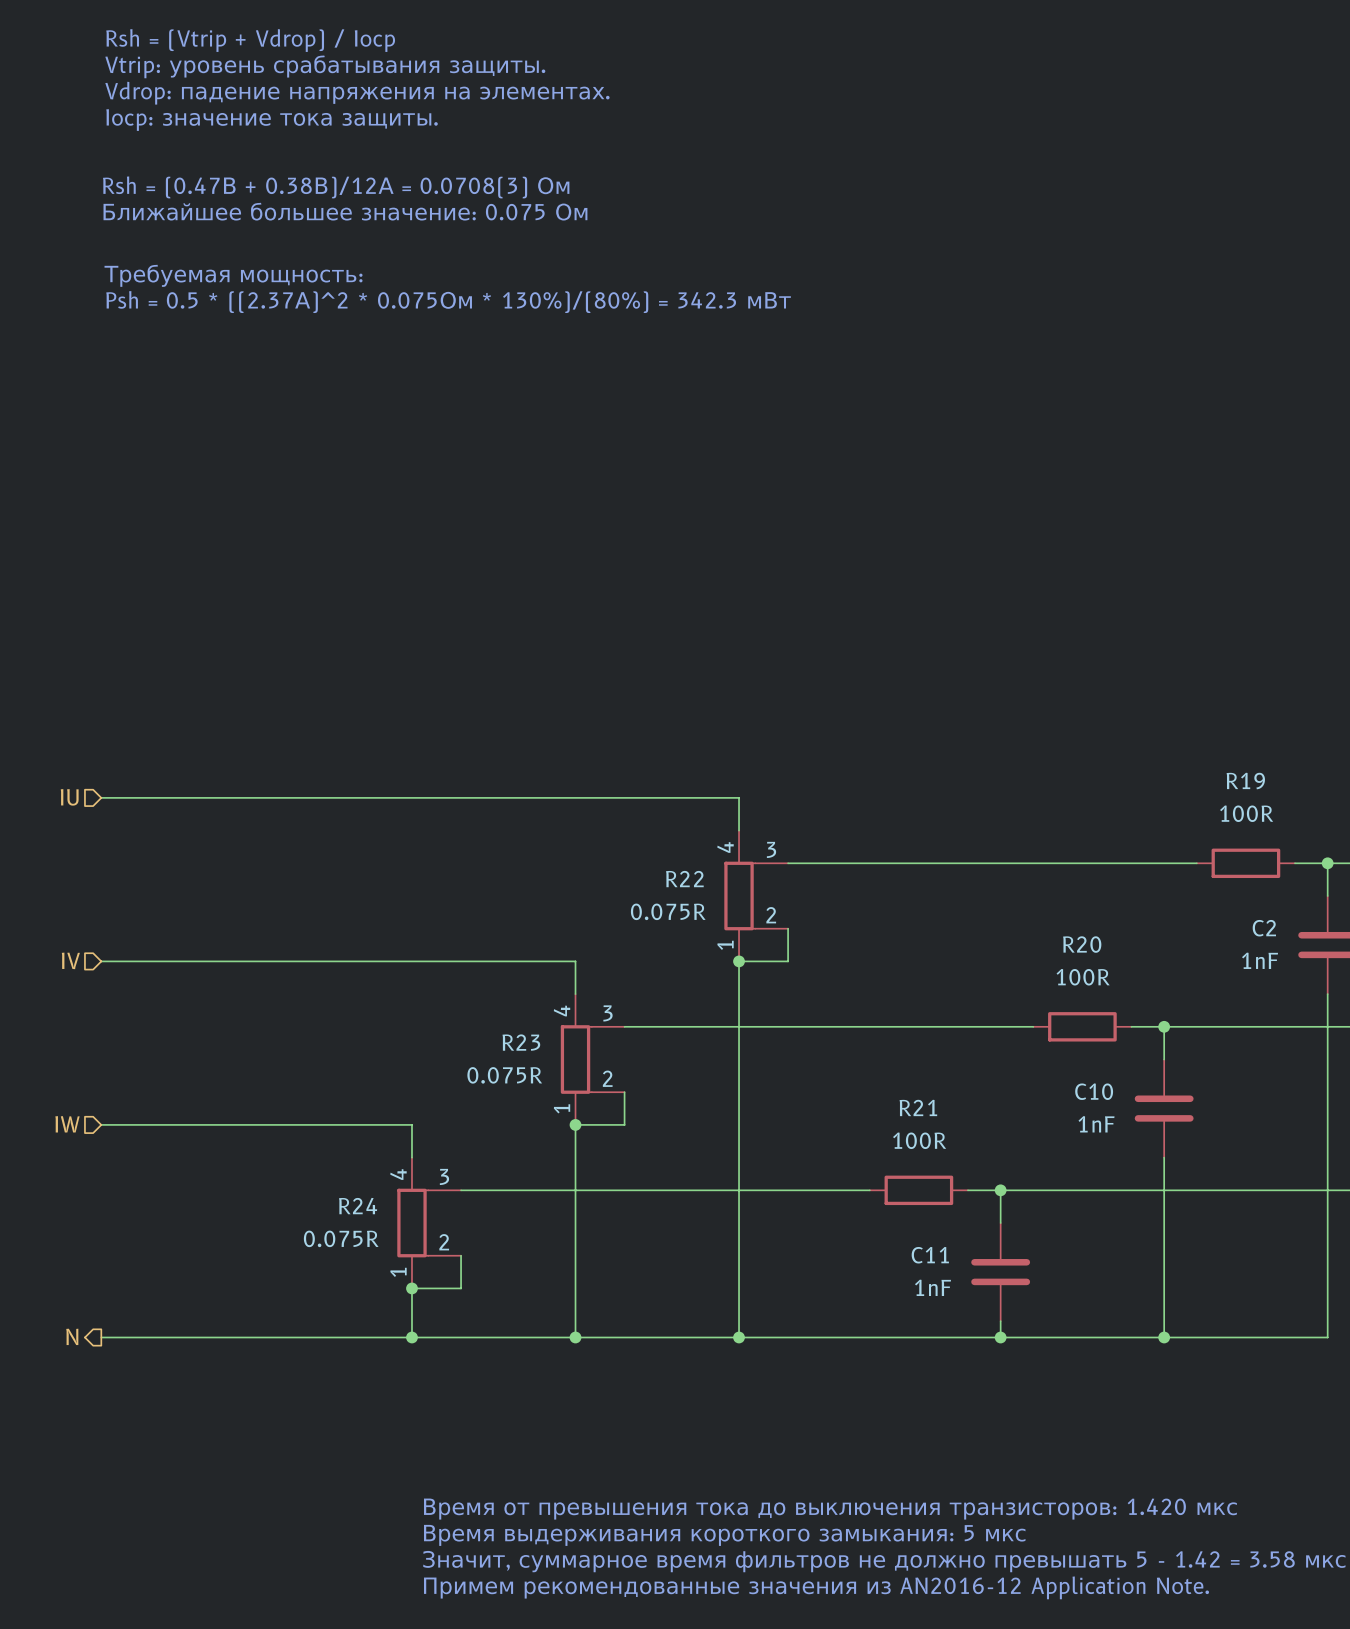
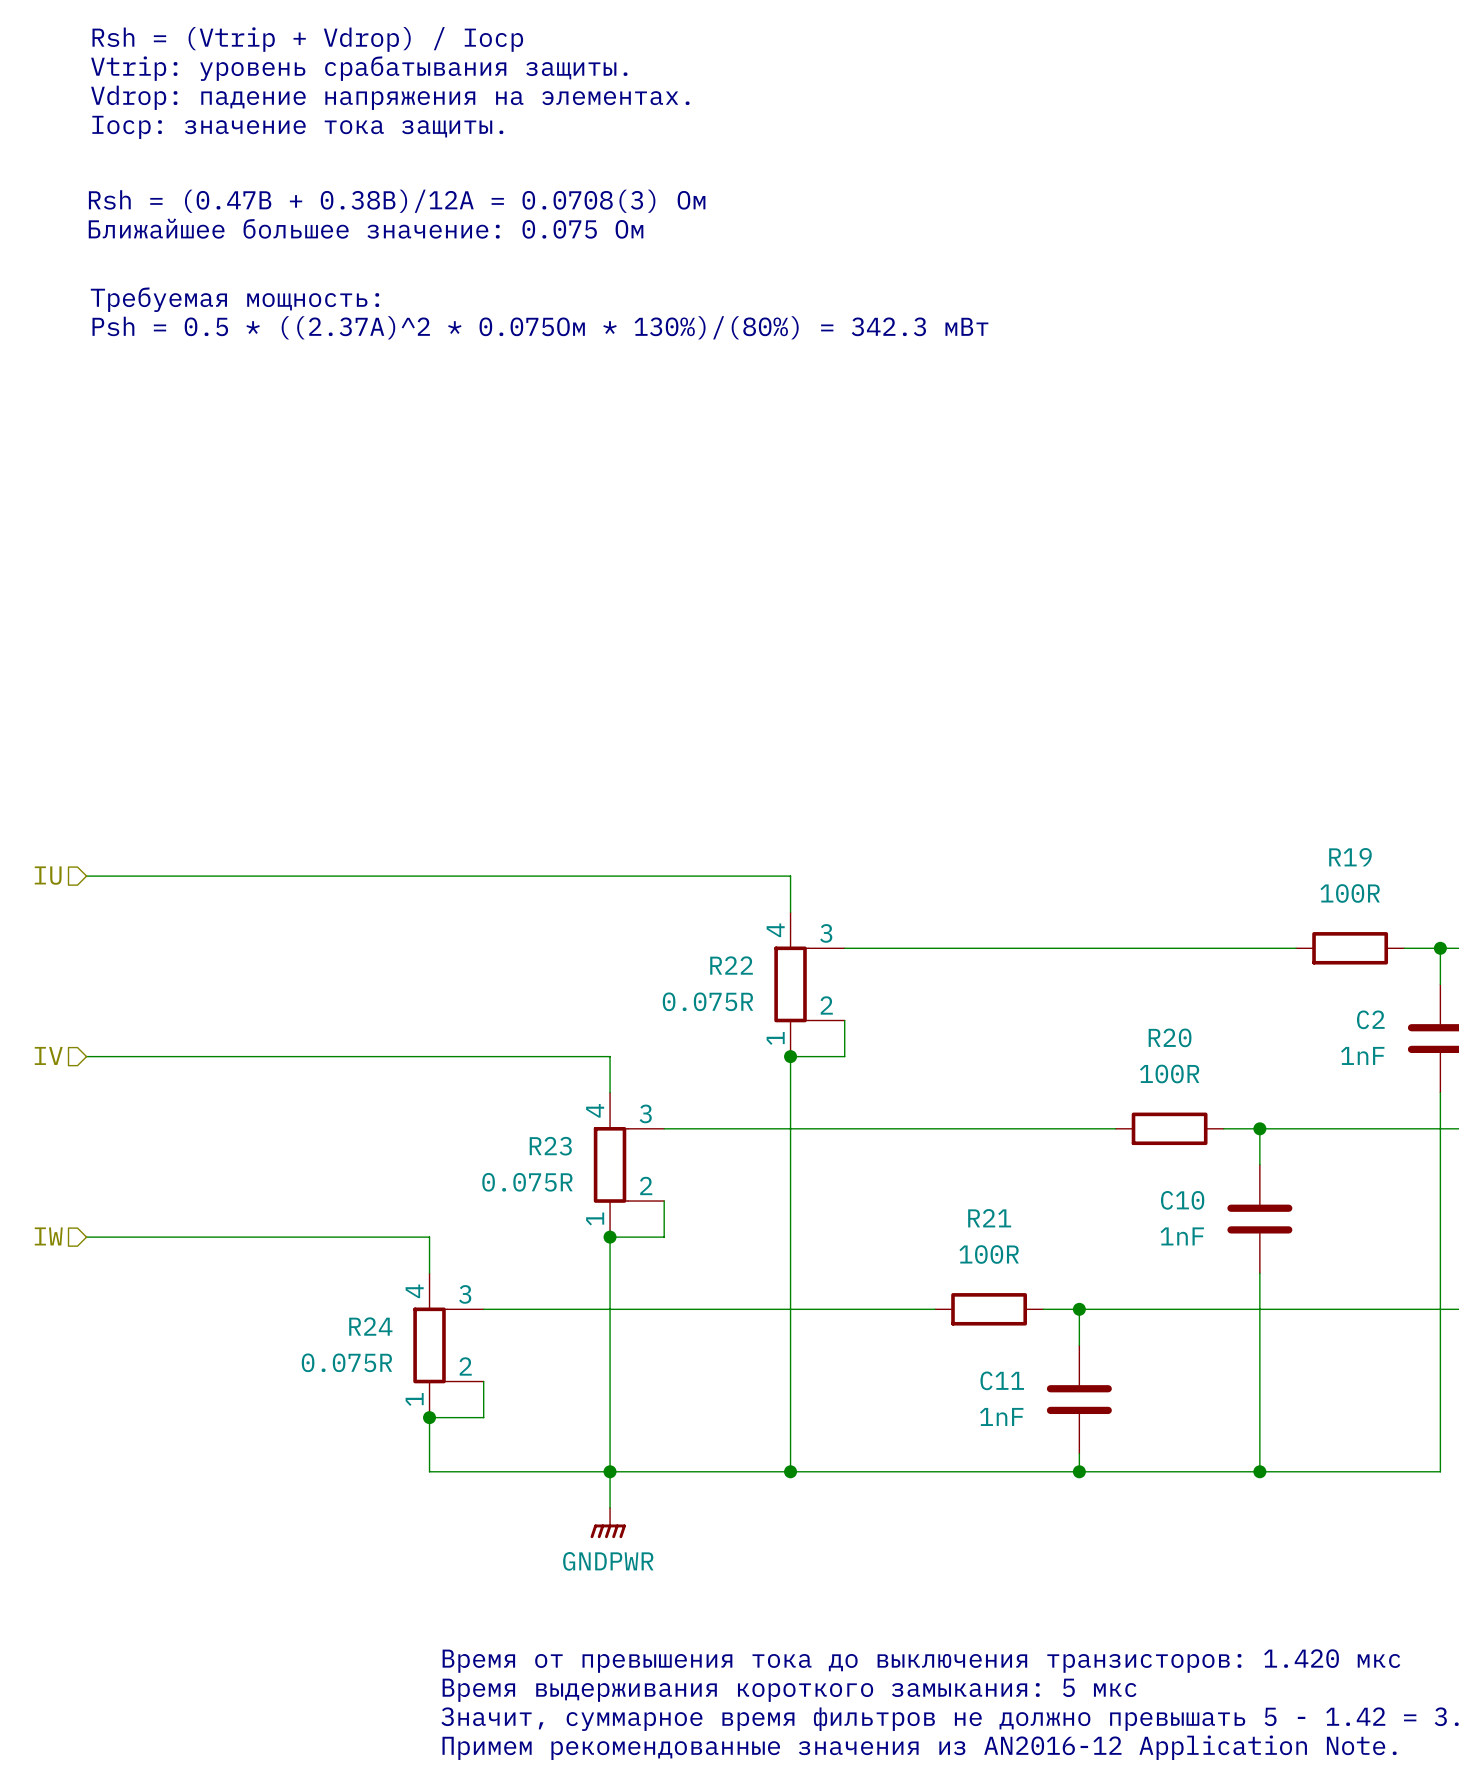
hierarchical label: N (72, 1336) -> none
wire: (101, 1337) (411, 1337) -> none
junction: (411, 1337) -> none
wire: none -> (610, 1471) (610, 1507)
power symbol: none -> GNDPWR (608, 1523)

